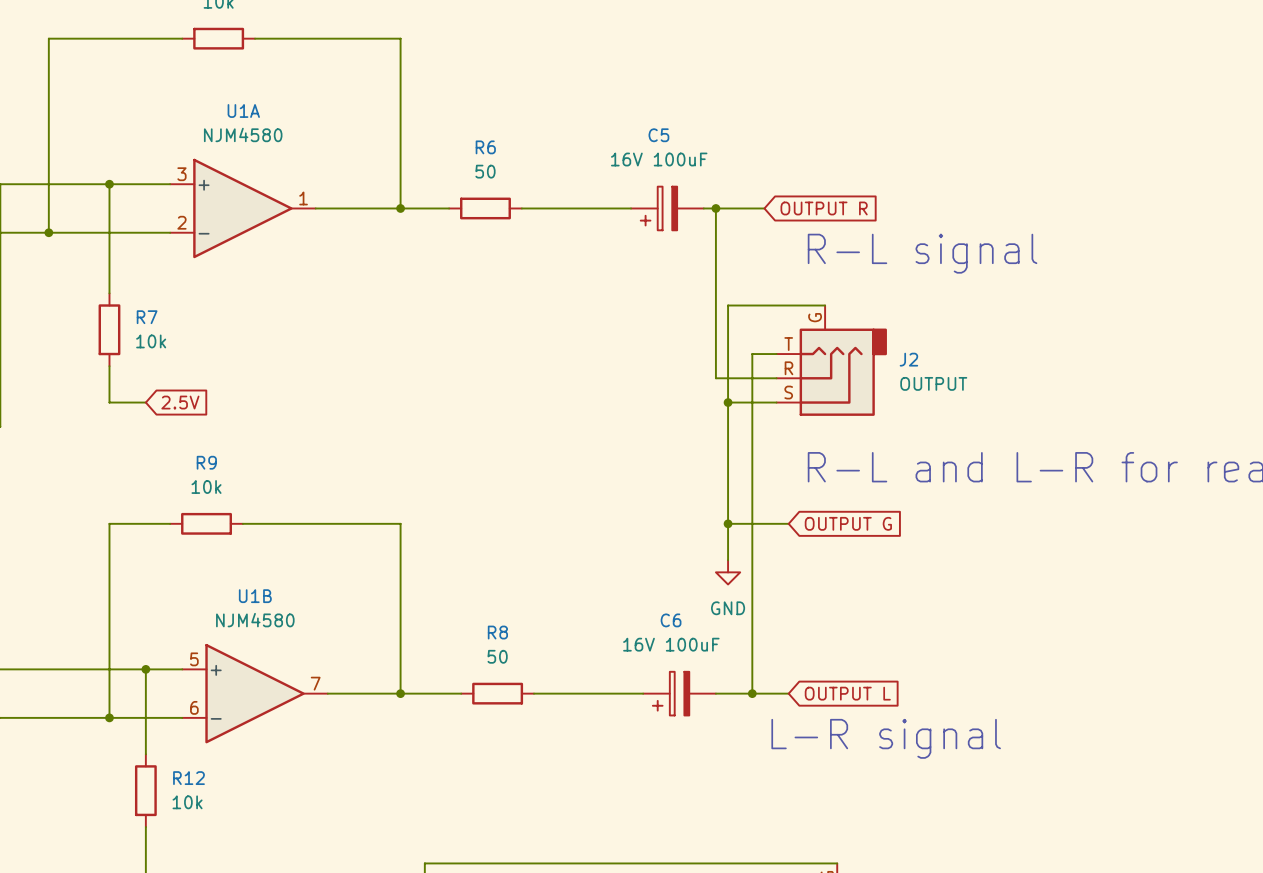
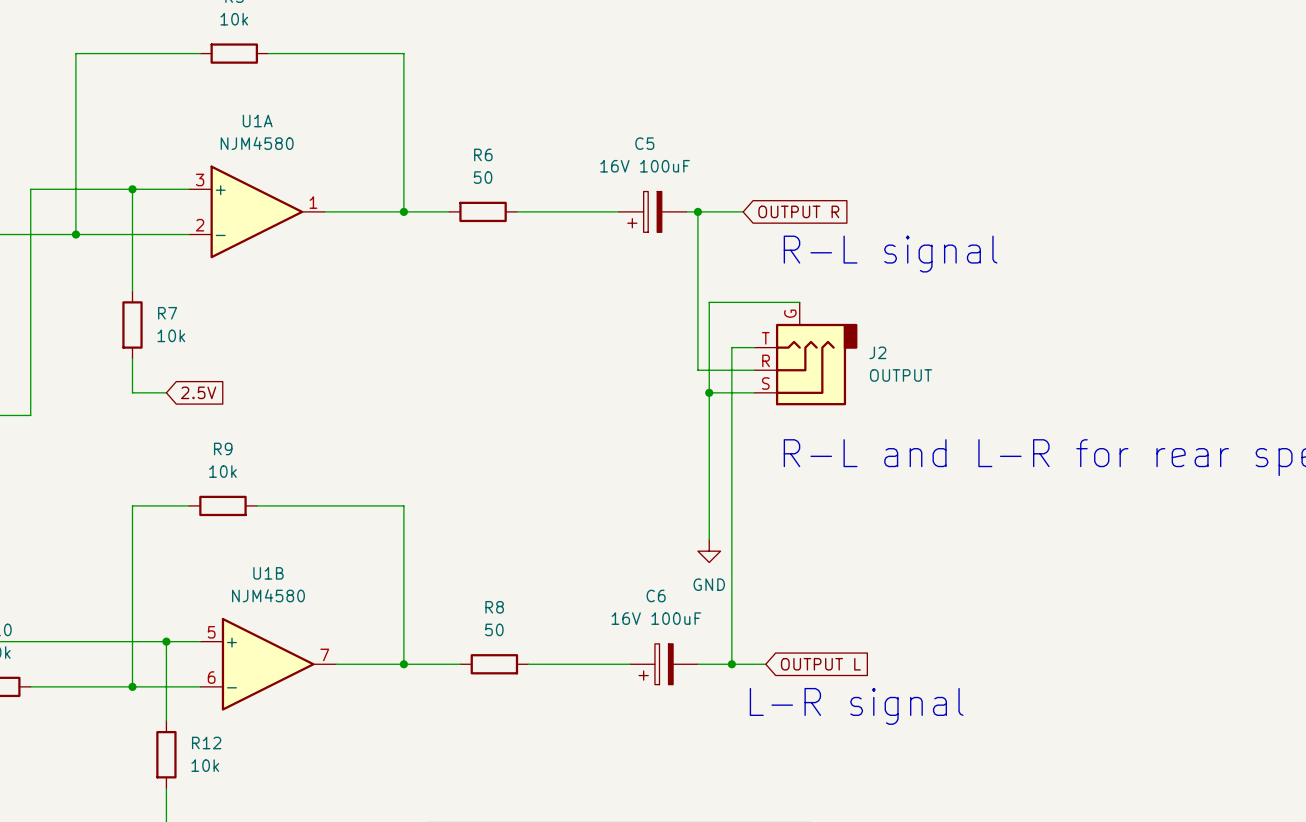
wire: (728, 523) (788, 523) -> none
junction: (728, 523) -> none
global label: OUTPUT G (848, 523) -> none

